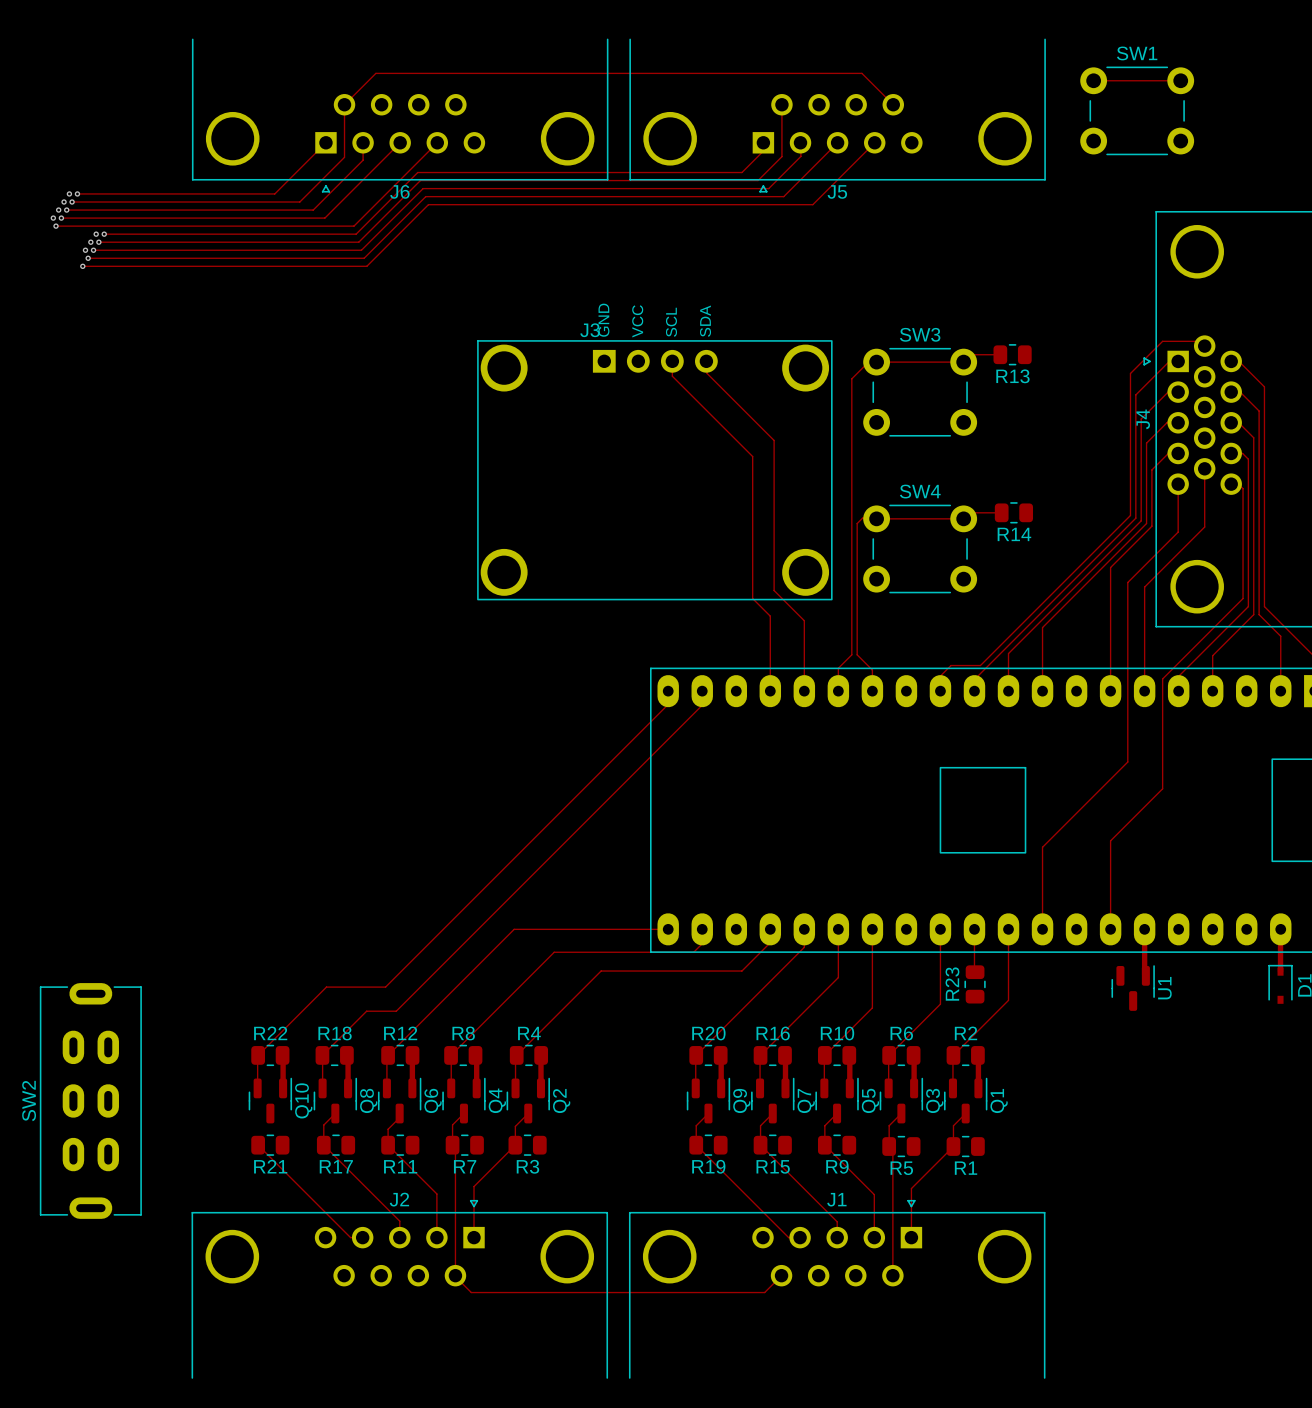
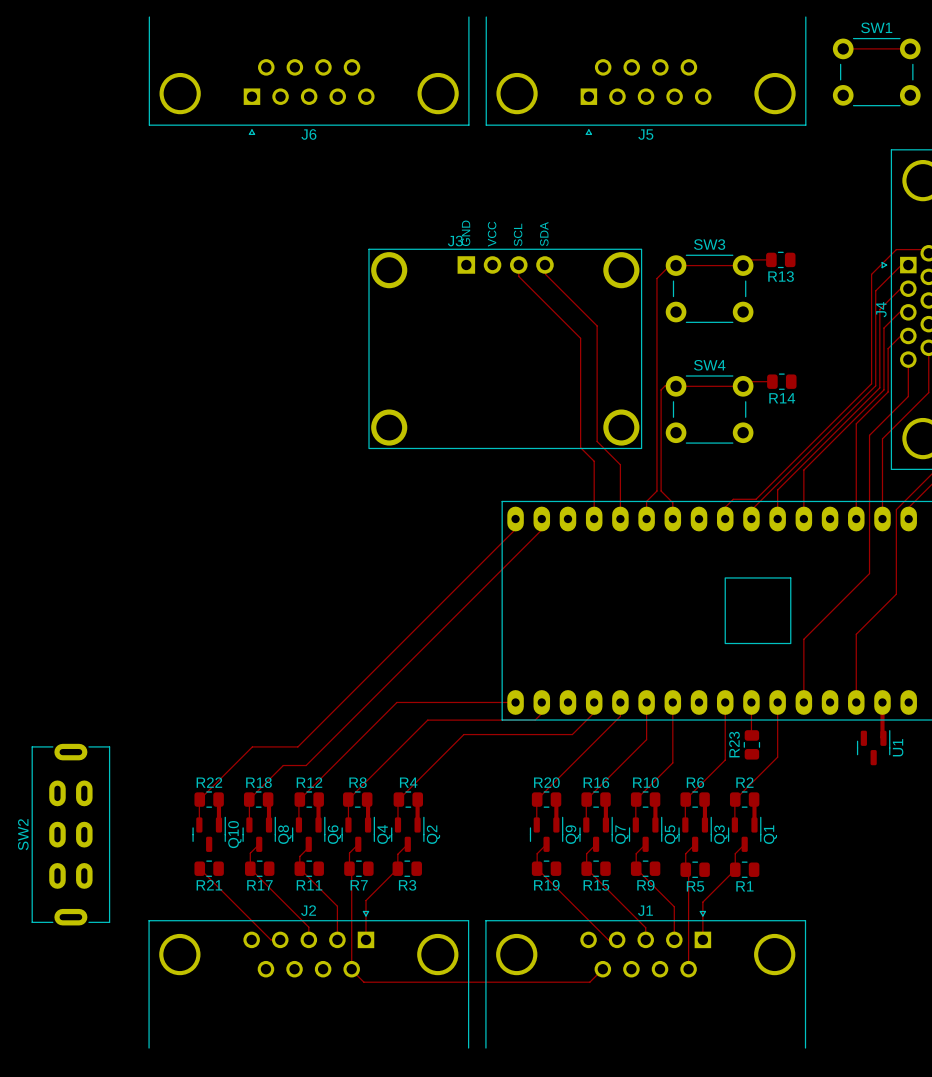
track: (781, 104) (781, 156) (758, 180) (420, 180) (358, 242) (98, 242) -> none
track: (893, 104) (861, 73) (375, 73) (344, 104) (344, 157) (299, 202) (72, 202) -> none
track: (325, 142) (274, 193) (77, 193) -> none
track: (363, 142) (363, 160) (313, 210) (66, 210) -> none
track: (400, 142) (324, 218) (61, 218) -> none
track: (437, 142) (353, 226) (56, 226) -> none
track: (763, 142) (763, 151) (741, 172) (417, 172) (356, 234) (104, 234) -> none
track: (800, 142) (800, 156) (768, 188) (423, 188) (361, 250) (93, 250) -> none
track: (837, 142) (783, 196) (425, 196) (364, 258) (88, 258) -> none
track: (874, 142) (812, 204) (428, 204) (366, 266) (82, 266) -> none
via: (69, 193) -> none
via: (77, 193) -> none
via: (64, 202) -> none
via: (72, 202) -> none
via: (58, 210) -> none
via: (66, 210) -> none
via: (53, 218) -> none
via: (61, 218) -> none
via: (56, 226) -> none
via: (96, 234) -> none
via: (104, 234) -> none
via: (90, 242) -> none
via: (98, 242) -> none
via: (85, 250) -> none
via: (93, 250) -> none
via: (88, 258) -> none
via: (82, 266) -> none

